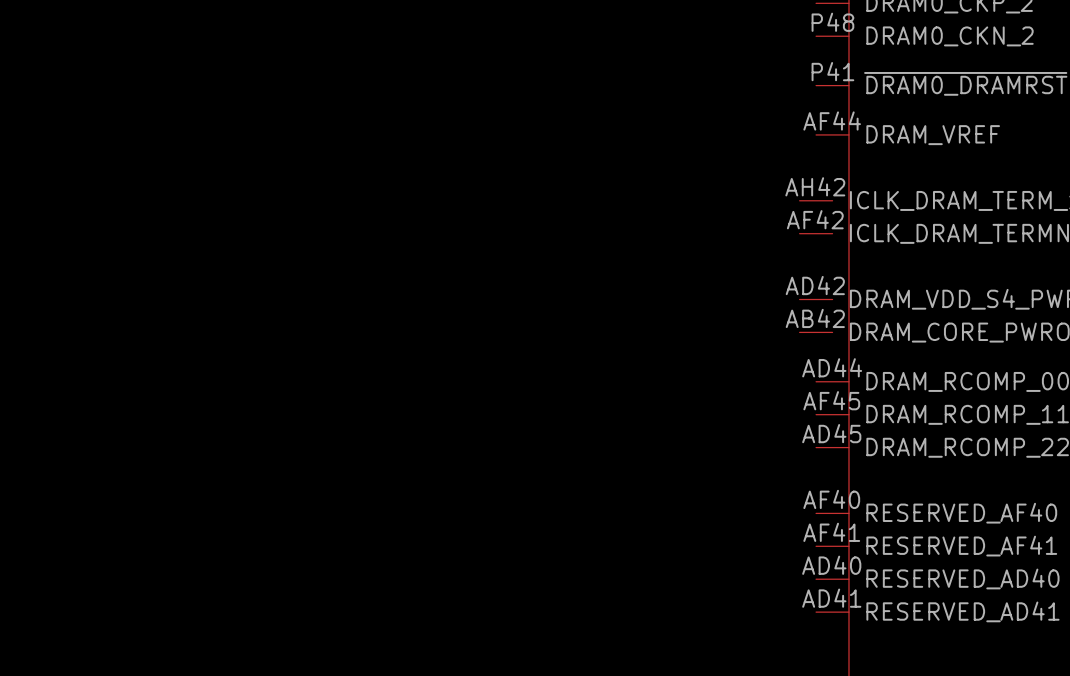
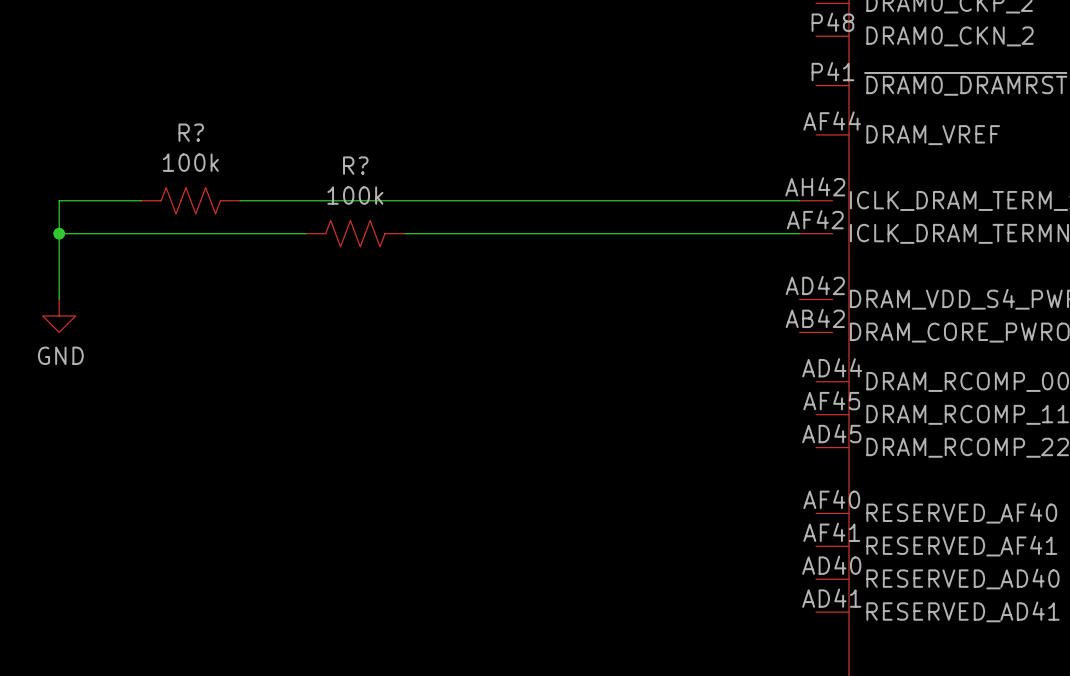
wire: none -> (141, 200) (59, 200) (59, 299)
R?: none -> 100k (190, 200)
wire: none -> (240, 200) (799, 200)
wire: none -> (59, 233) (306, 233)
junction: none -> (59, 233)
R?: none -> 100k (355, 233)
wire: none -> (404, 233) (799, 233)
power symbol: none -> GND (59, 315)

